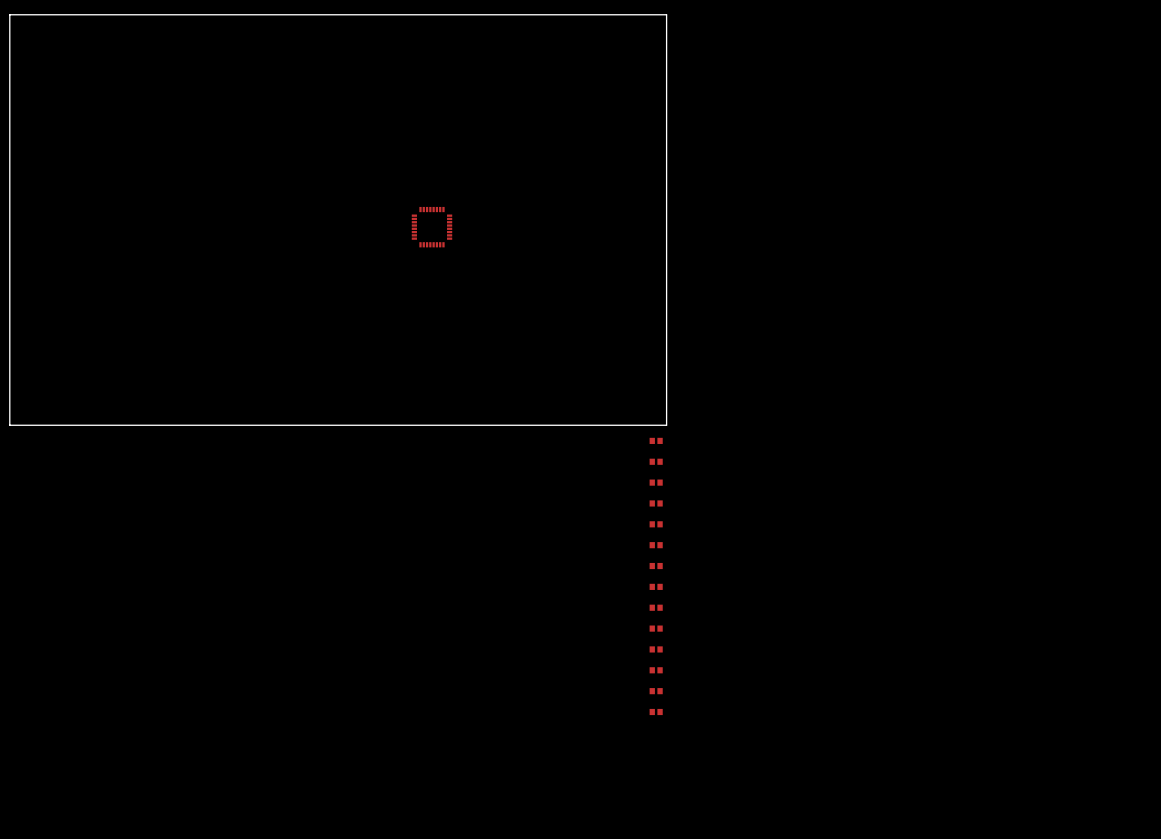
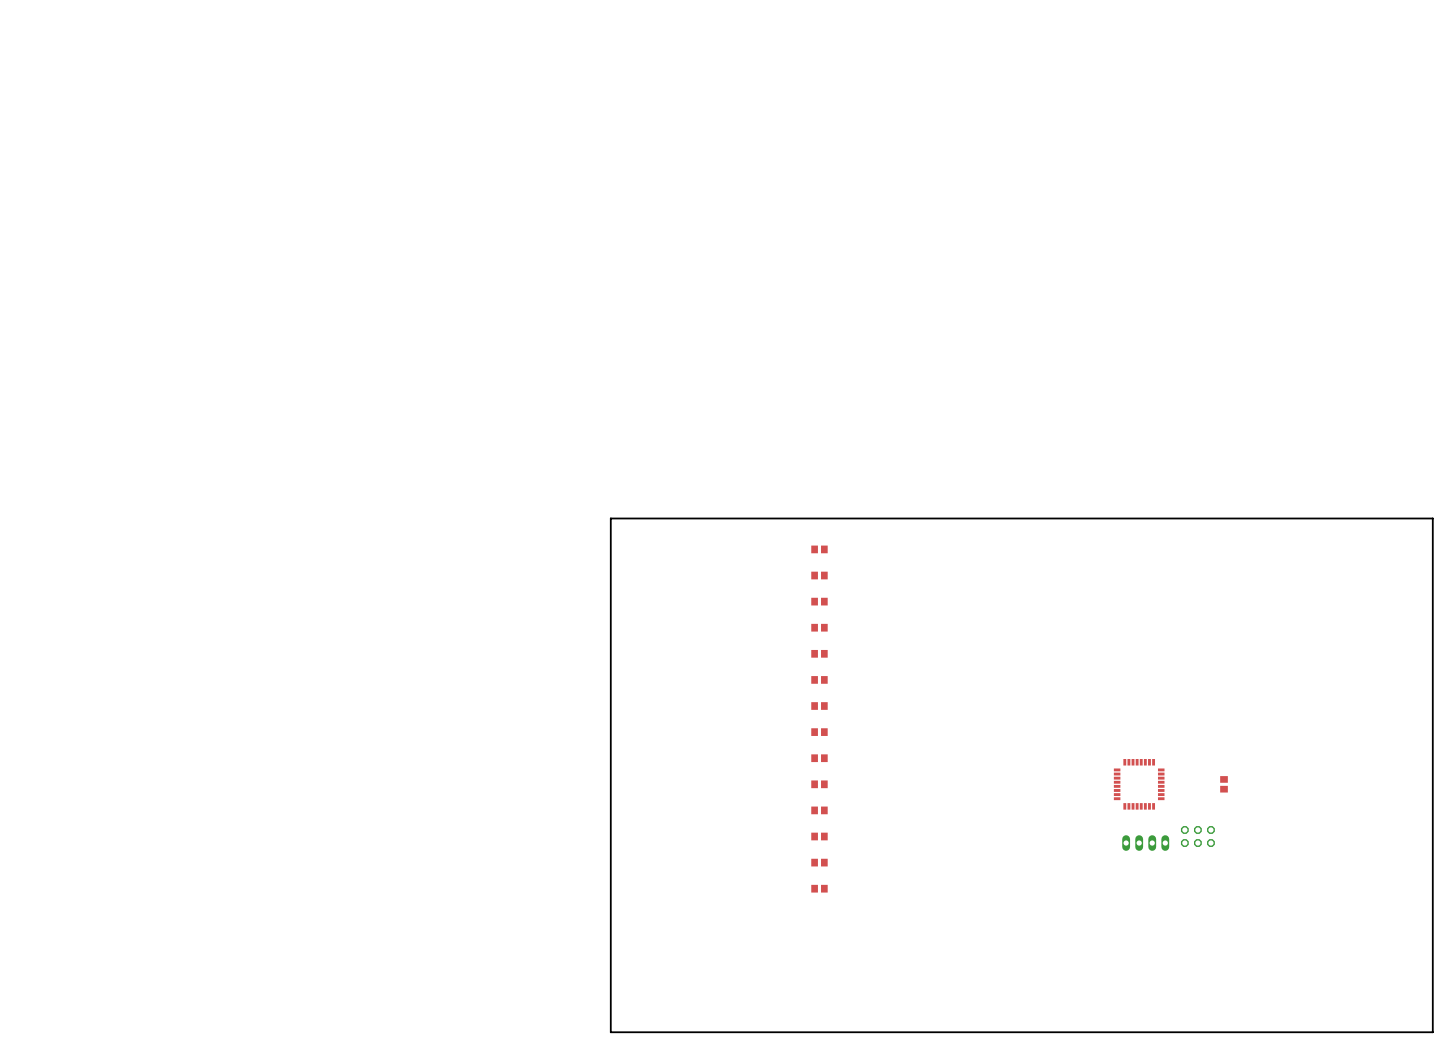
board edge: (666, 14) (9, 14) (9, 425) (666, 425) (666, 14) -> none
part: (431, 227) -> none
board edge: none -> (1432, 518) (610, 518) (610, 1032) (1432, 1032) (1432, 518)
part: none -> (1139, 784)
part: none -> (1224, 784)
part: none -> (1197, 836)
part: none -> (1145, 843)

